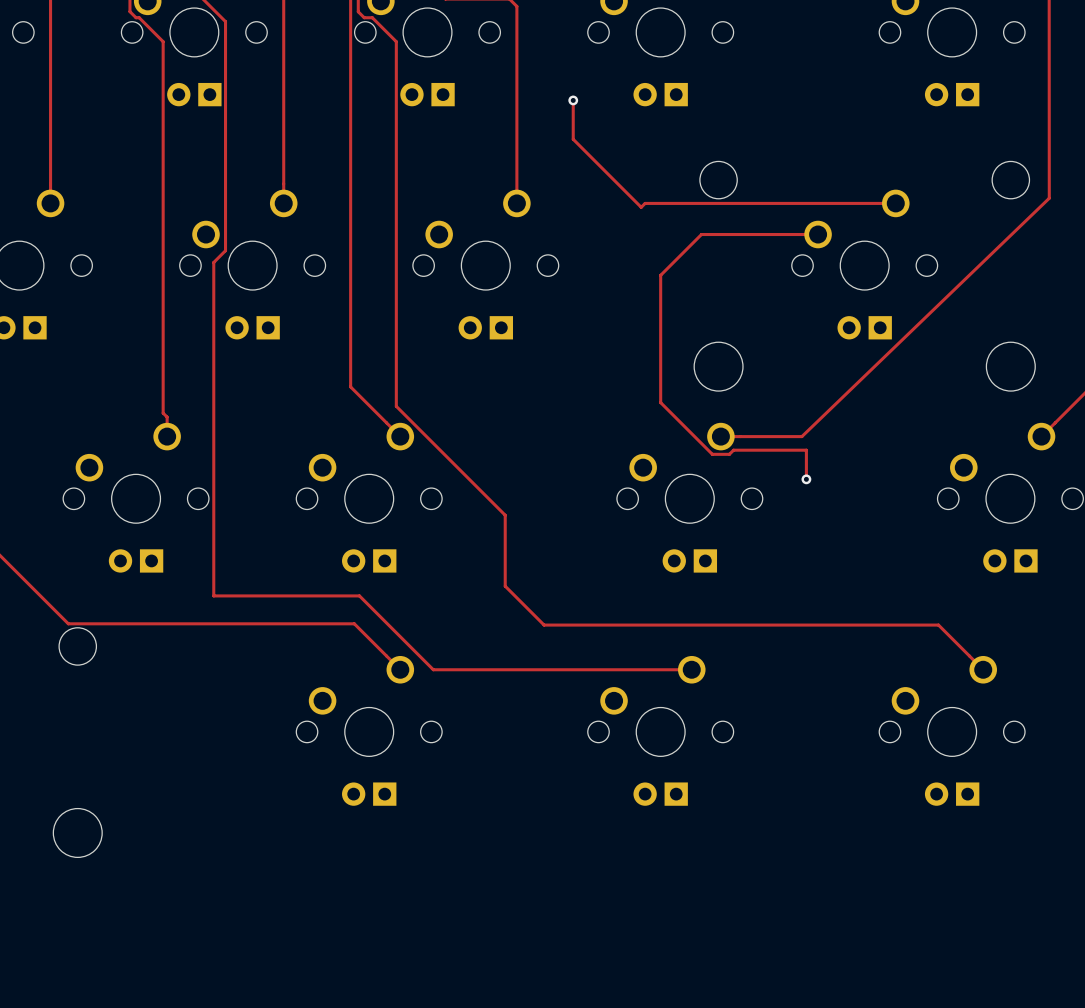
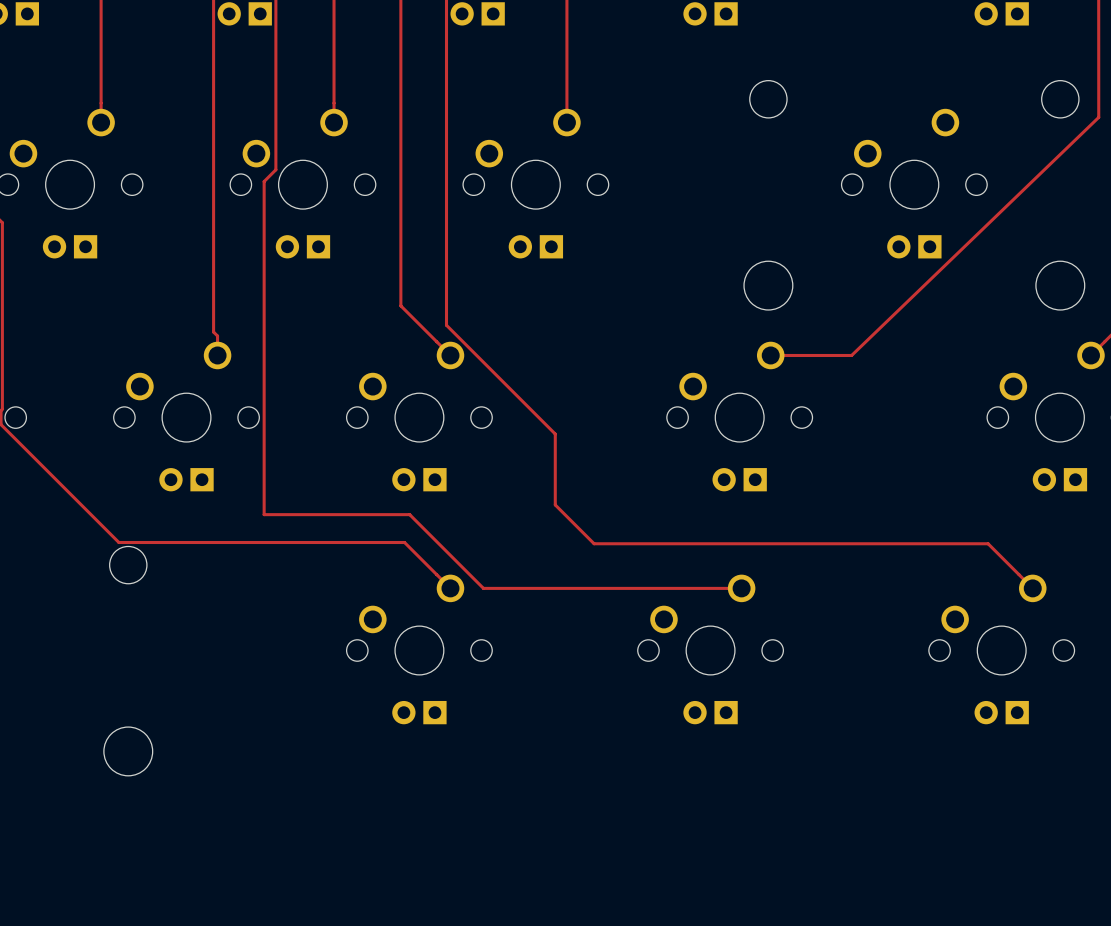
track: (573, 100) (573, 139) (641, 207) (645, 203) (895, 203) -> none
via: (573, 100) -> none
track: (818, 234) (701, 234) (660, 275) (660, 402) (712, 454) (729, 454) (733, 450) (806, 450) (806, 479) -> none
via: (806, 479) -> none

